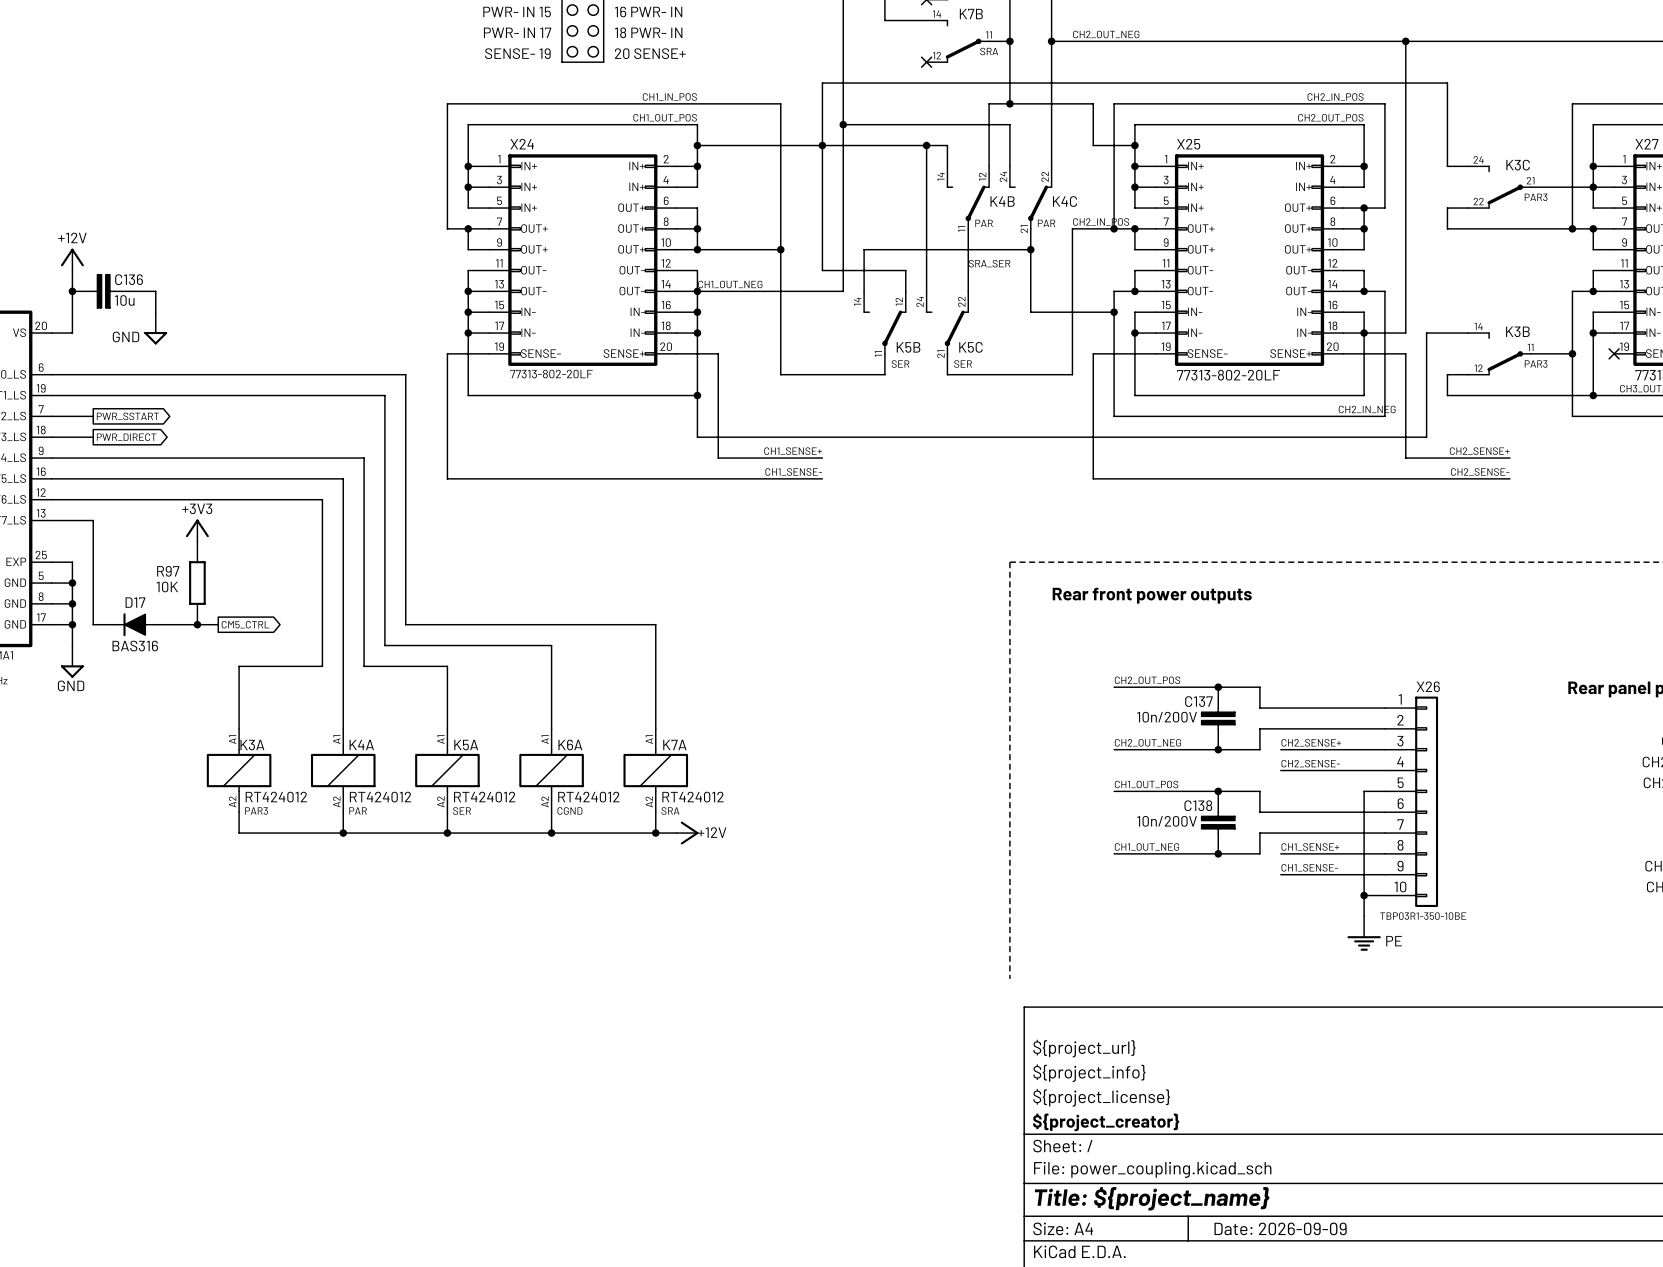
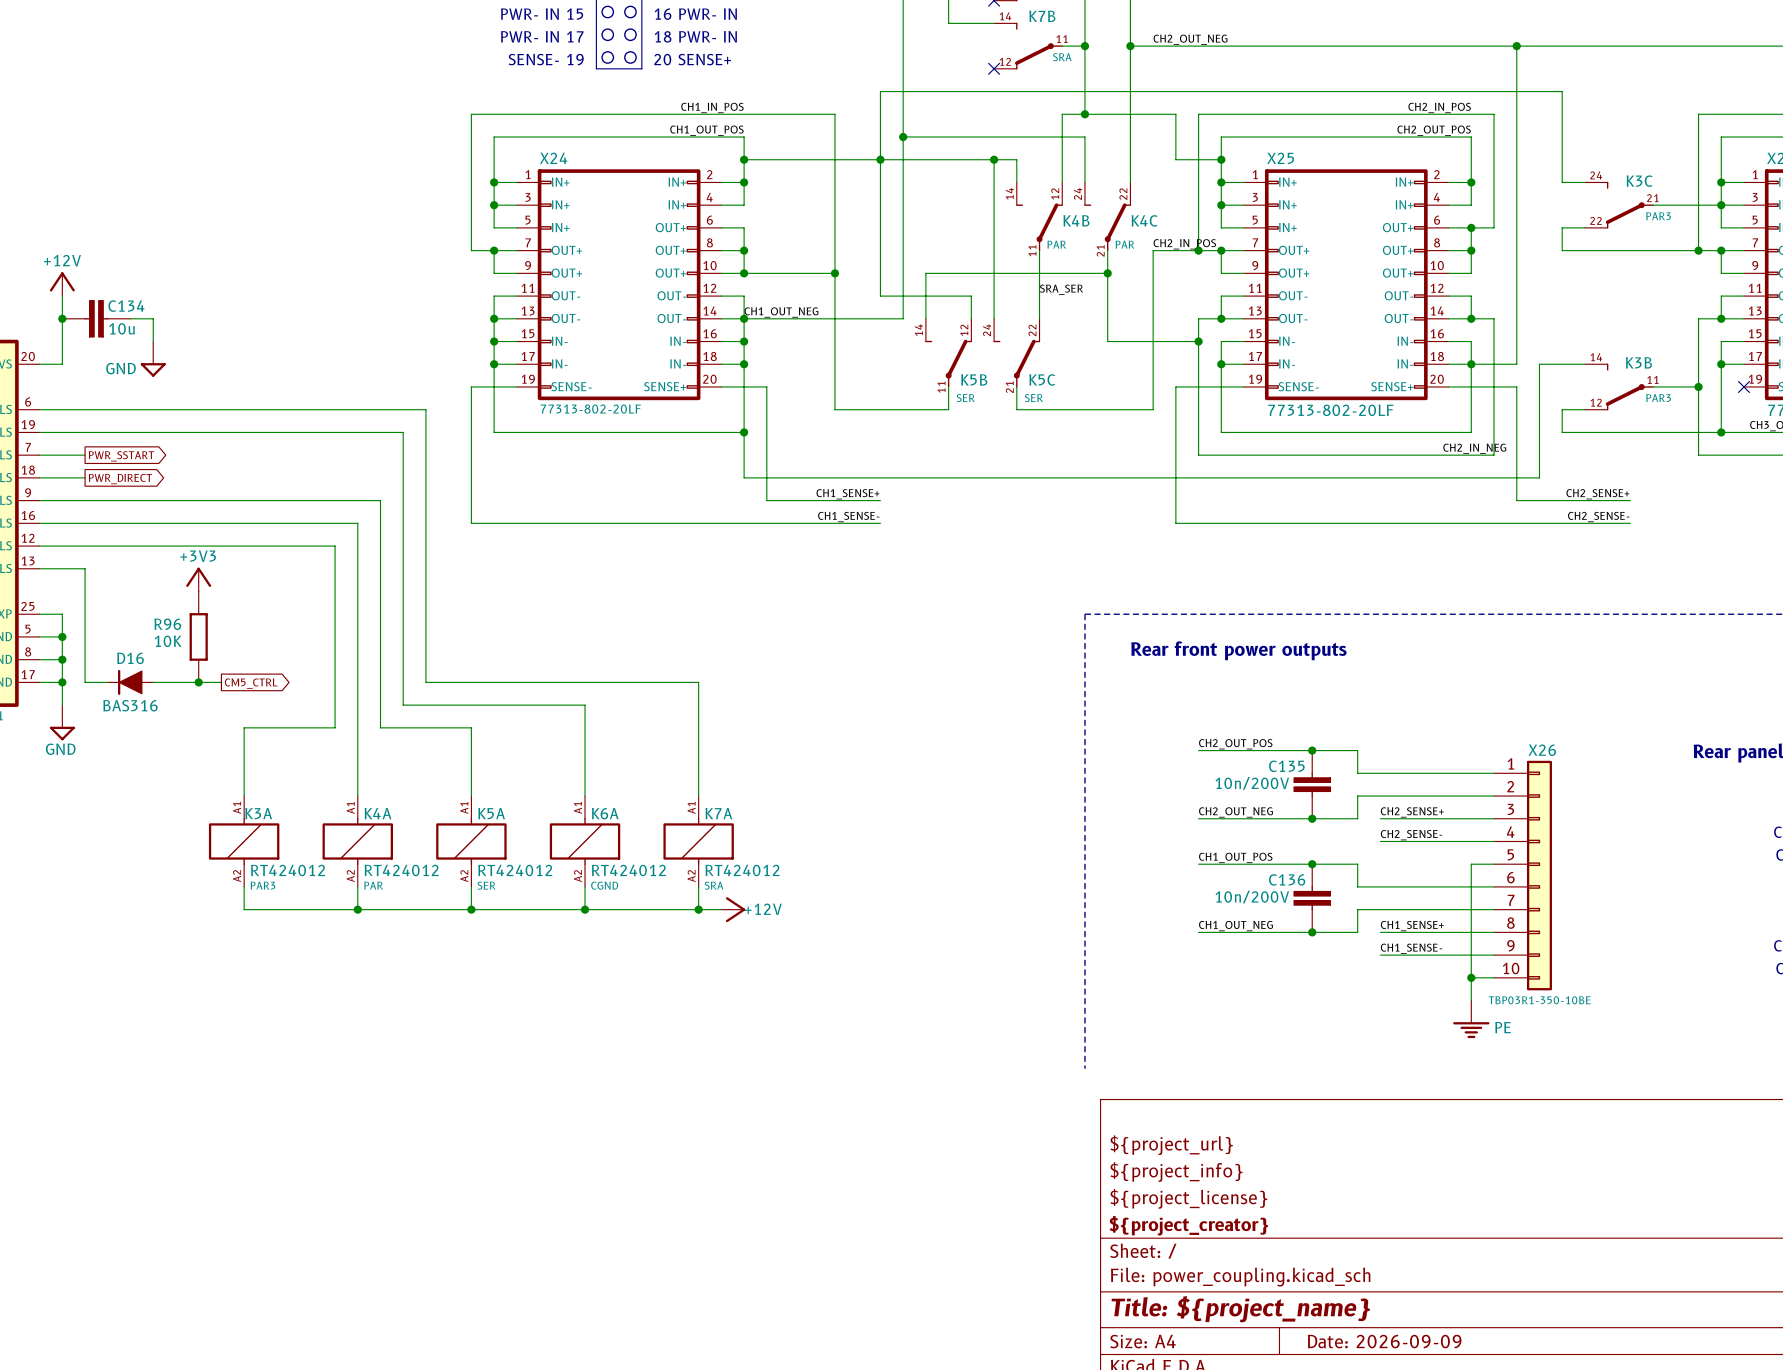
C136 name: C136 (129, 279) -> C134 (126, 306)
R97 name: R97 (168, 571) -> R96 (167, 624)
D17 name: D17 (135, 602) -> D16 (130, 658)
C137 name: C137 (1198, 701) -> C135 (1286, 766)
C138 name: C138 (1198, 805) -> C136 (1287, 879)

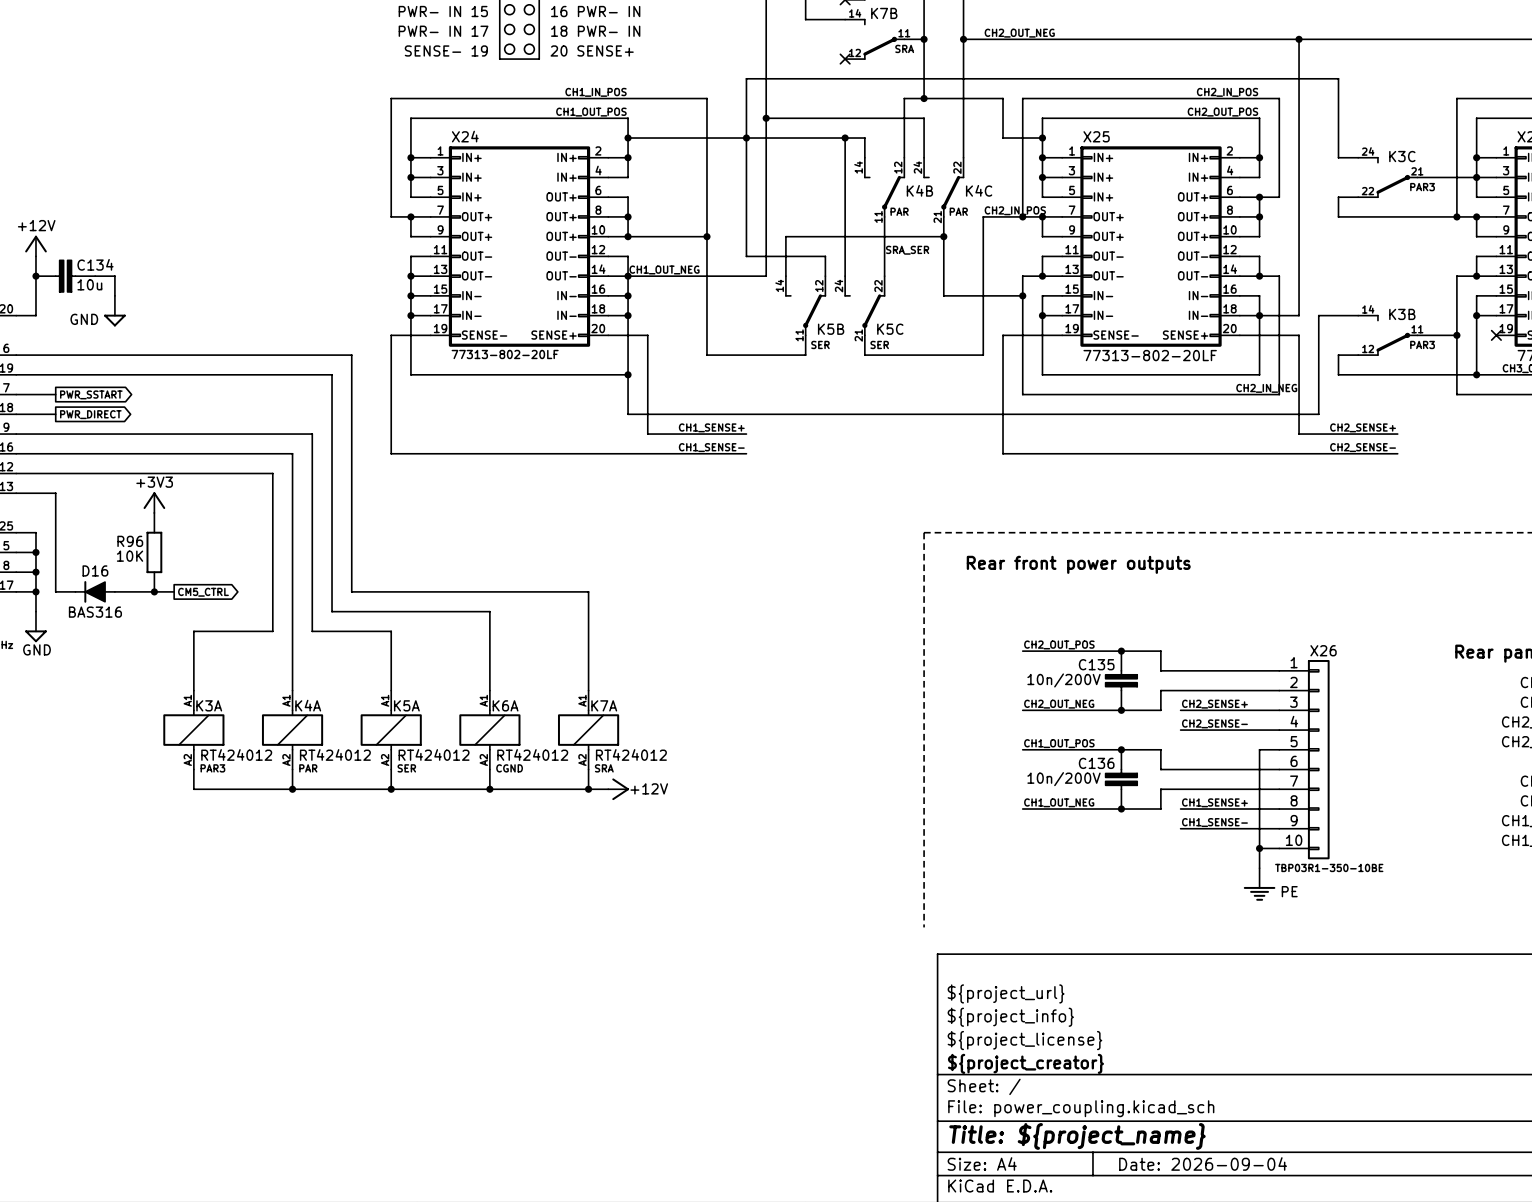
title block: Date: 2026-09-09 (1384, 1341) -> Date: 2026-09-04 (1203, 1163)

